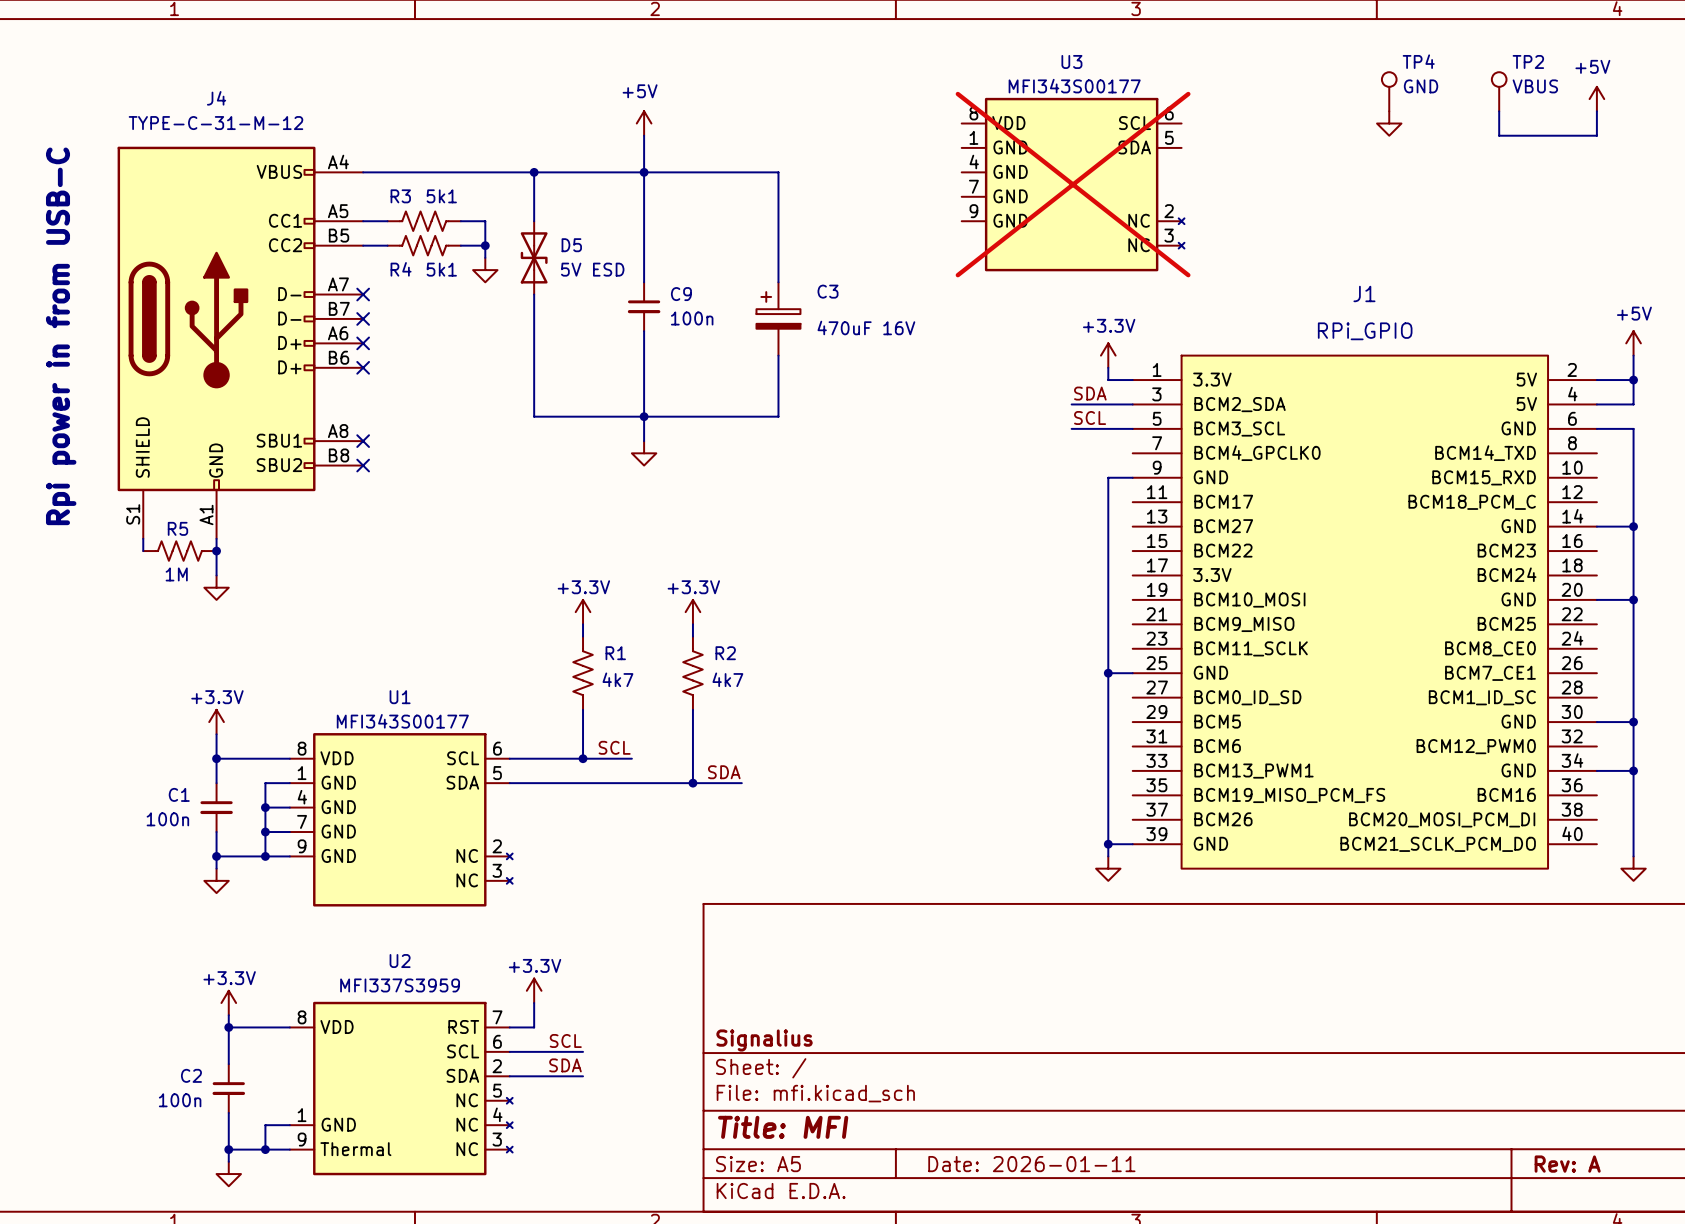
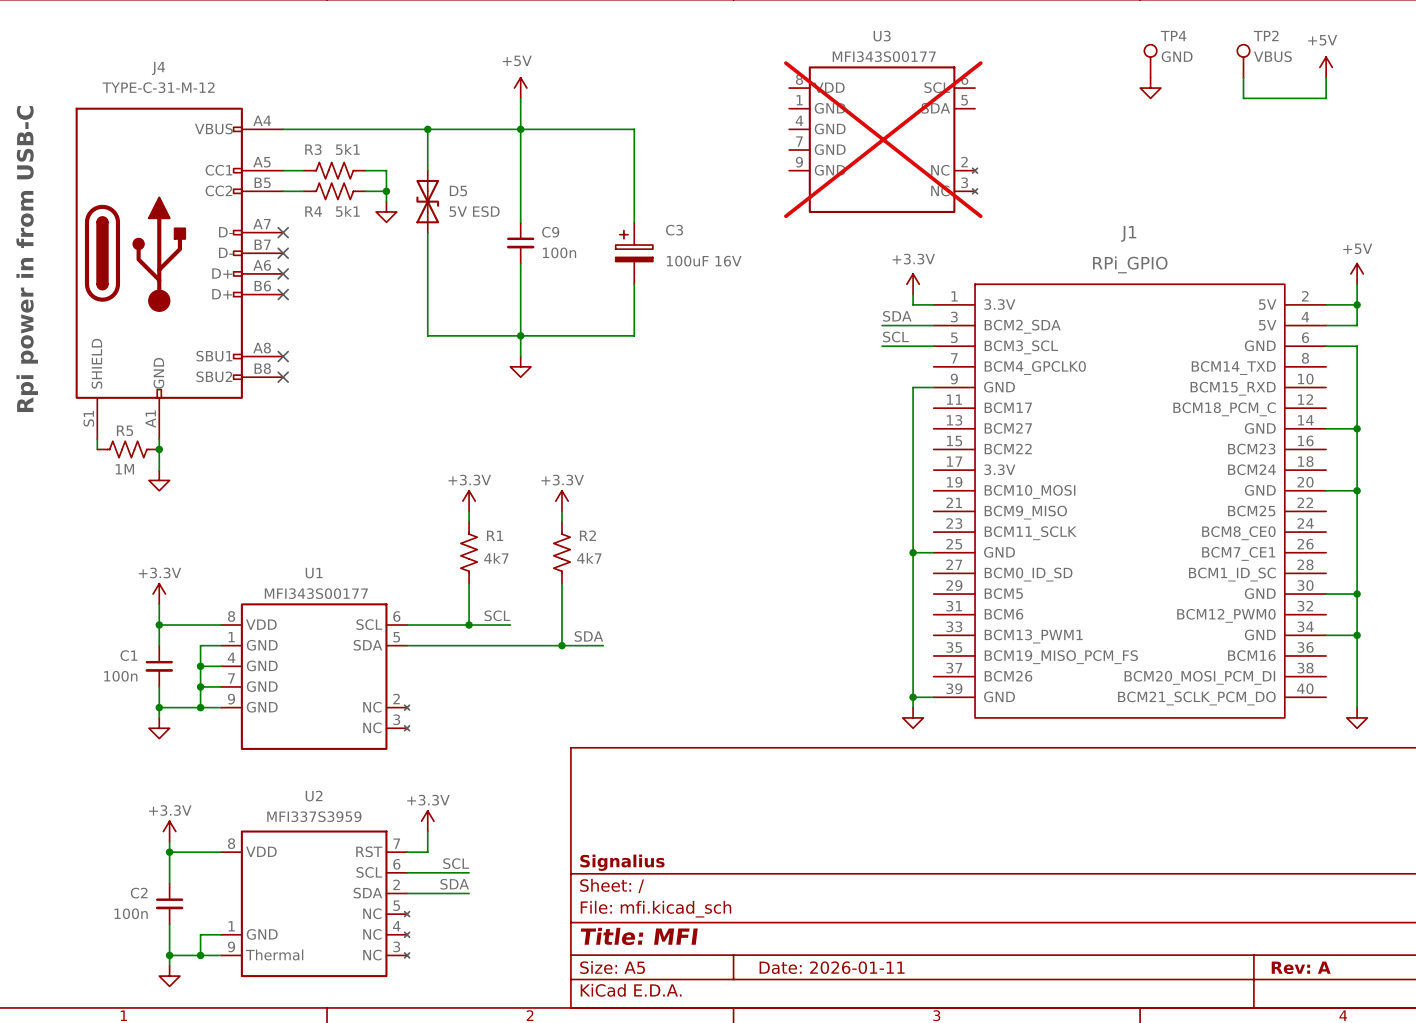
C3 value: 470uF 16V (866, 327) -> 100uF 16V (704, 261)

